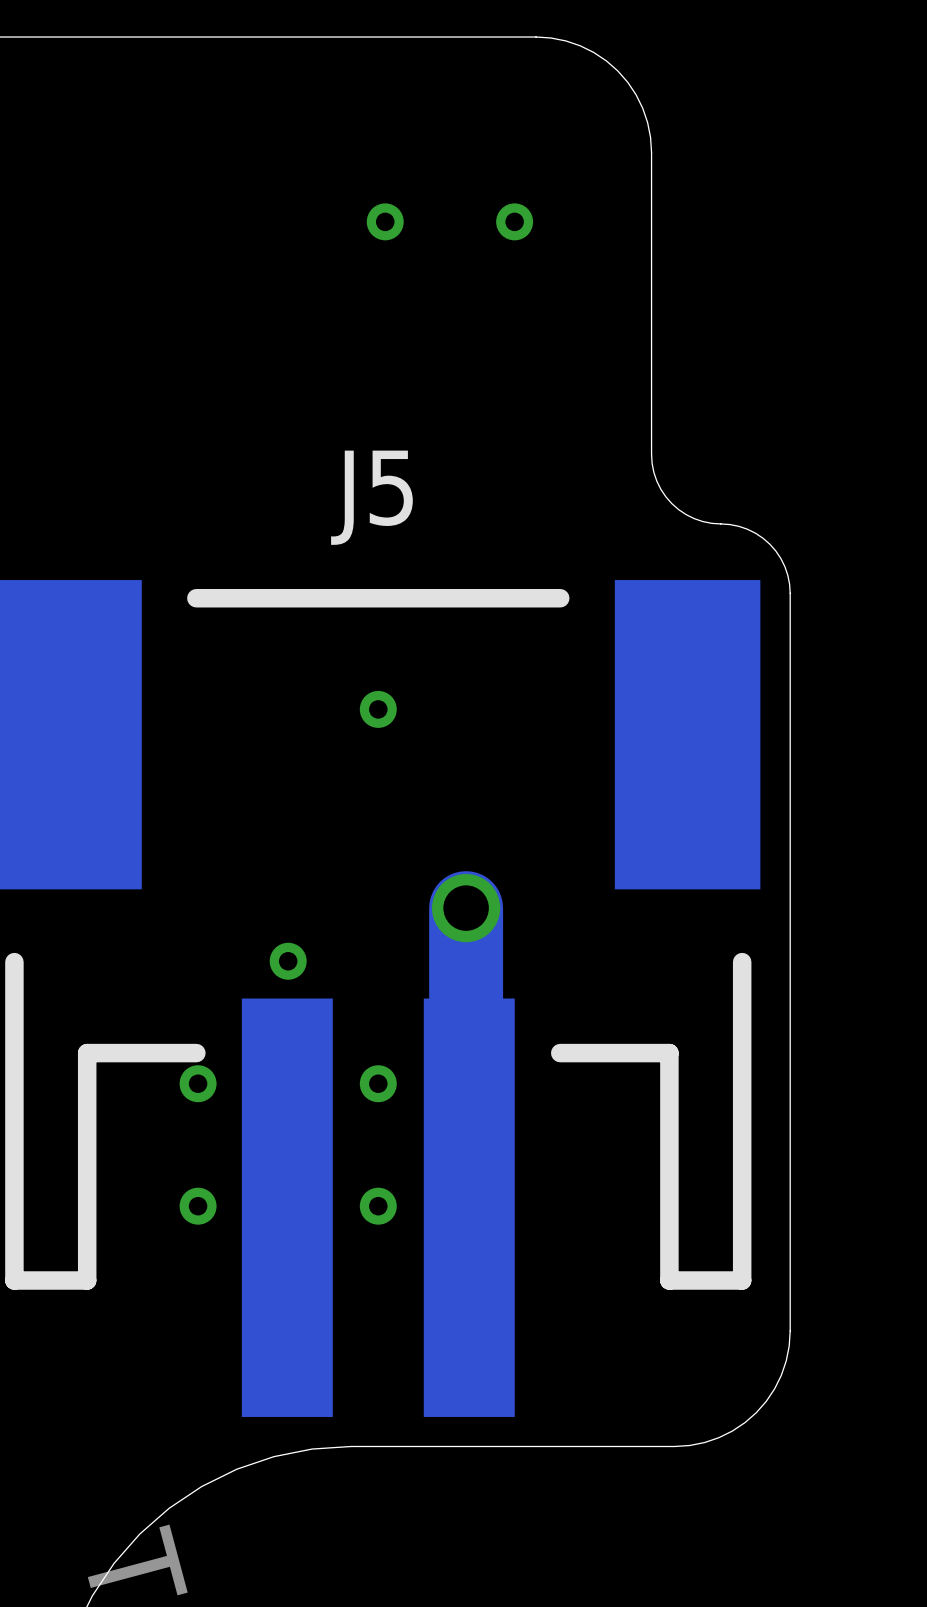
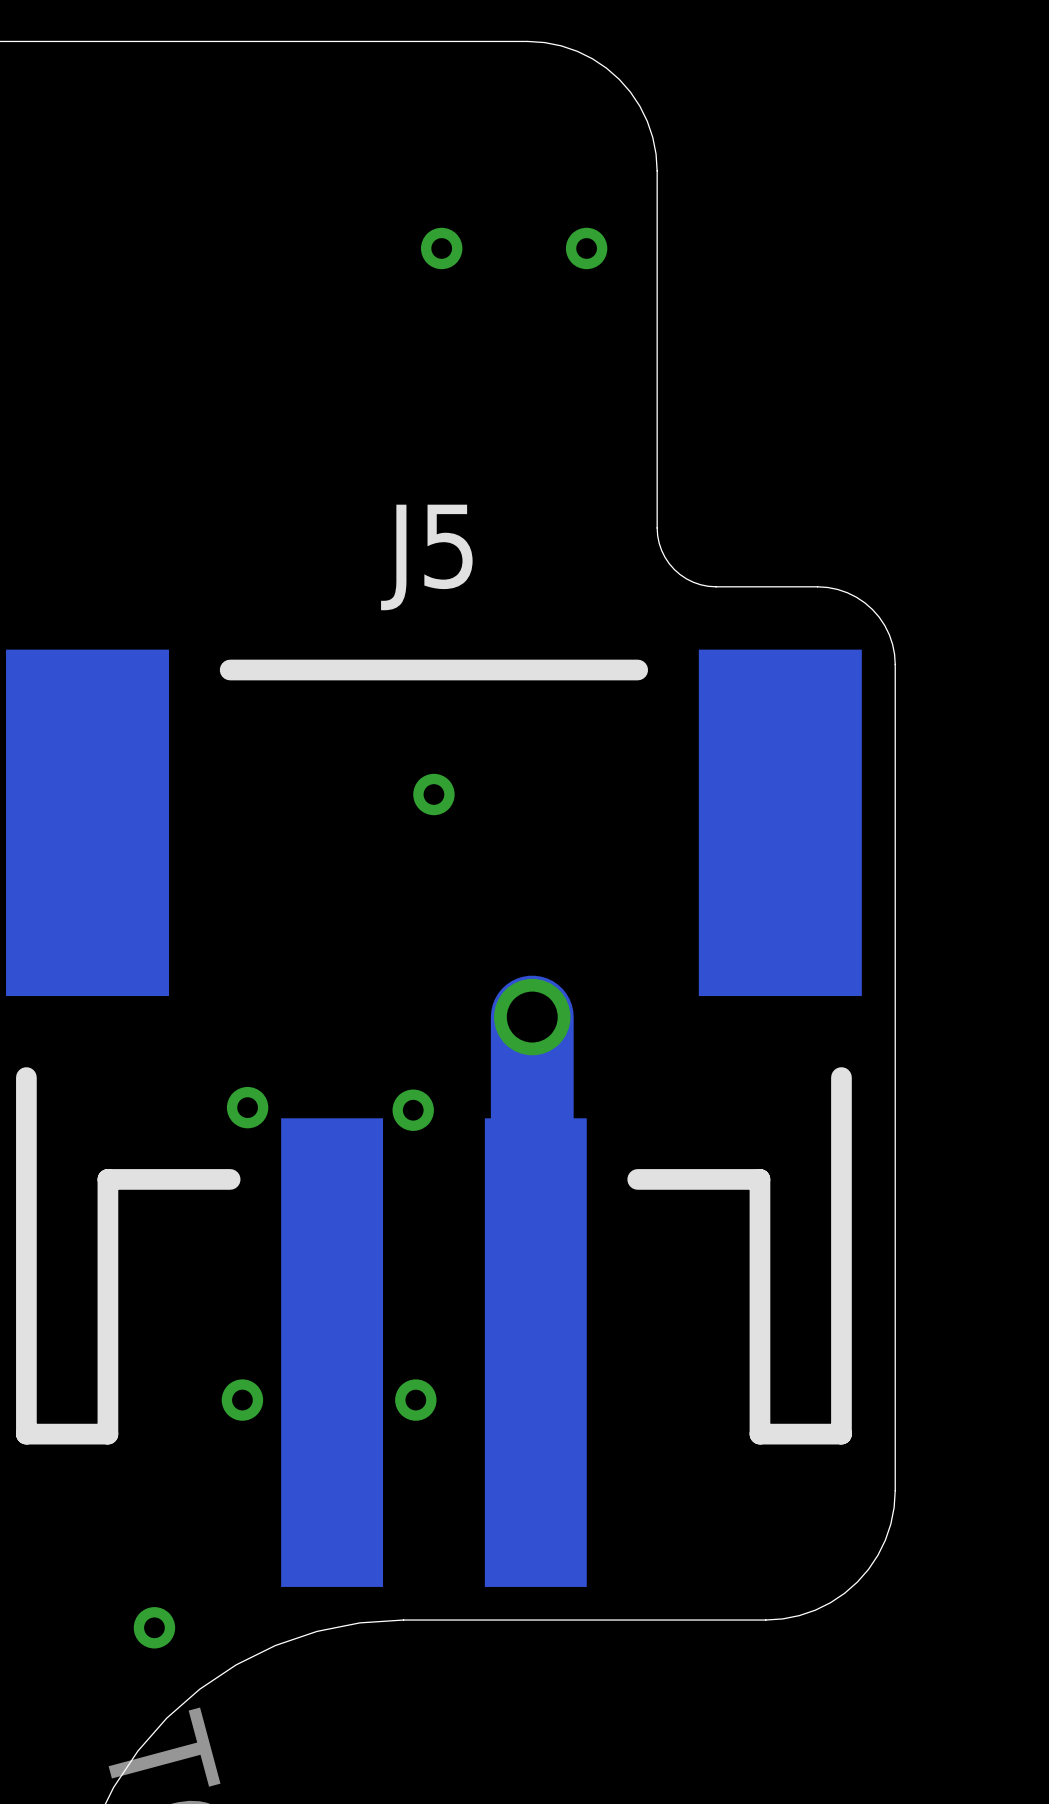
board edge: (462, 37) (536, 37) (565, 40) (593, 52) (606, 60) (627, 82) (636, 94) (647, 122) (651, 152) (652, 463) (660, 489) (678, 509) (694, 518) (720, 523) -> (527, 41) (561, 45) (592, 58) (606, 68) (630, 92) (639, 106) (652, 137) (657, 170) (657, 527) (659, 543) (665, 557) (674, 569) (686, 578) (708, 586) (817, 586)
via: (288, 961) -> none
via: none -> (247, 1107)
via: none -> (413, 1110)
via: (198, 1083) -> none
via: (378, 1083) -> none
via position: (198, 1206) -> (242, 1400)
via position: (378, 1206) -> (415, 1400)
via: none -> (154, 1627)

